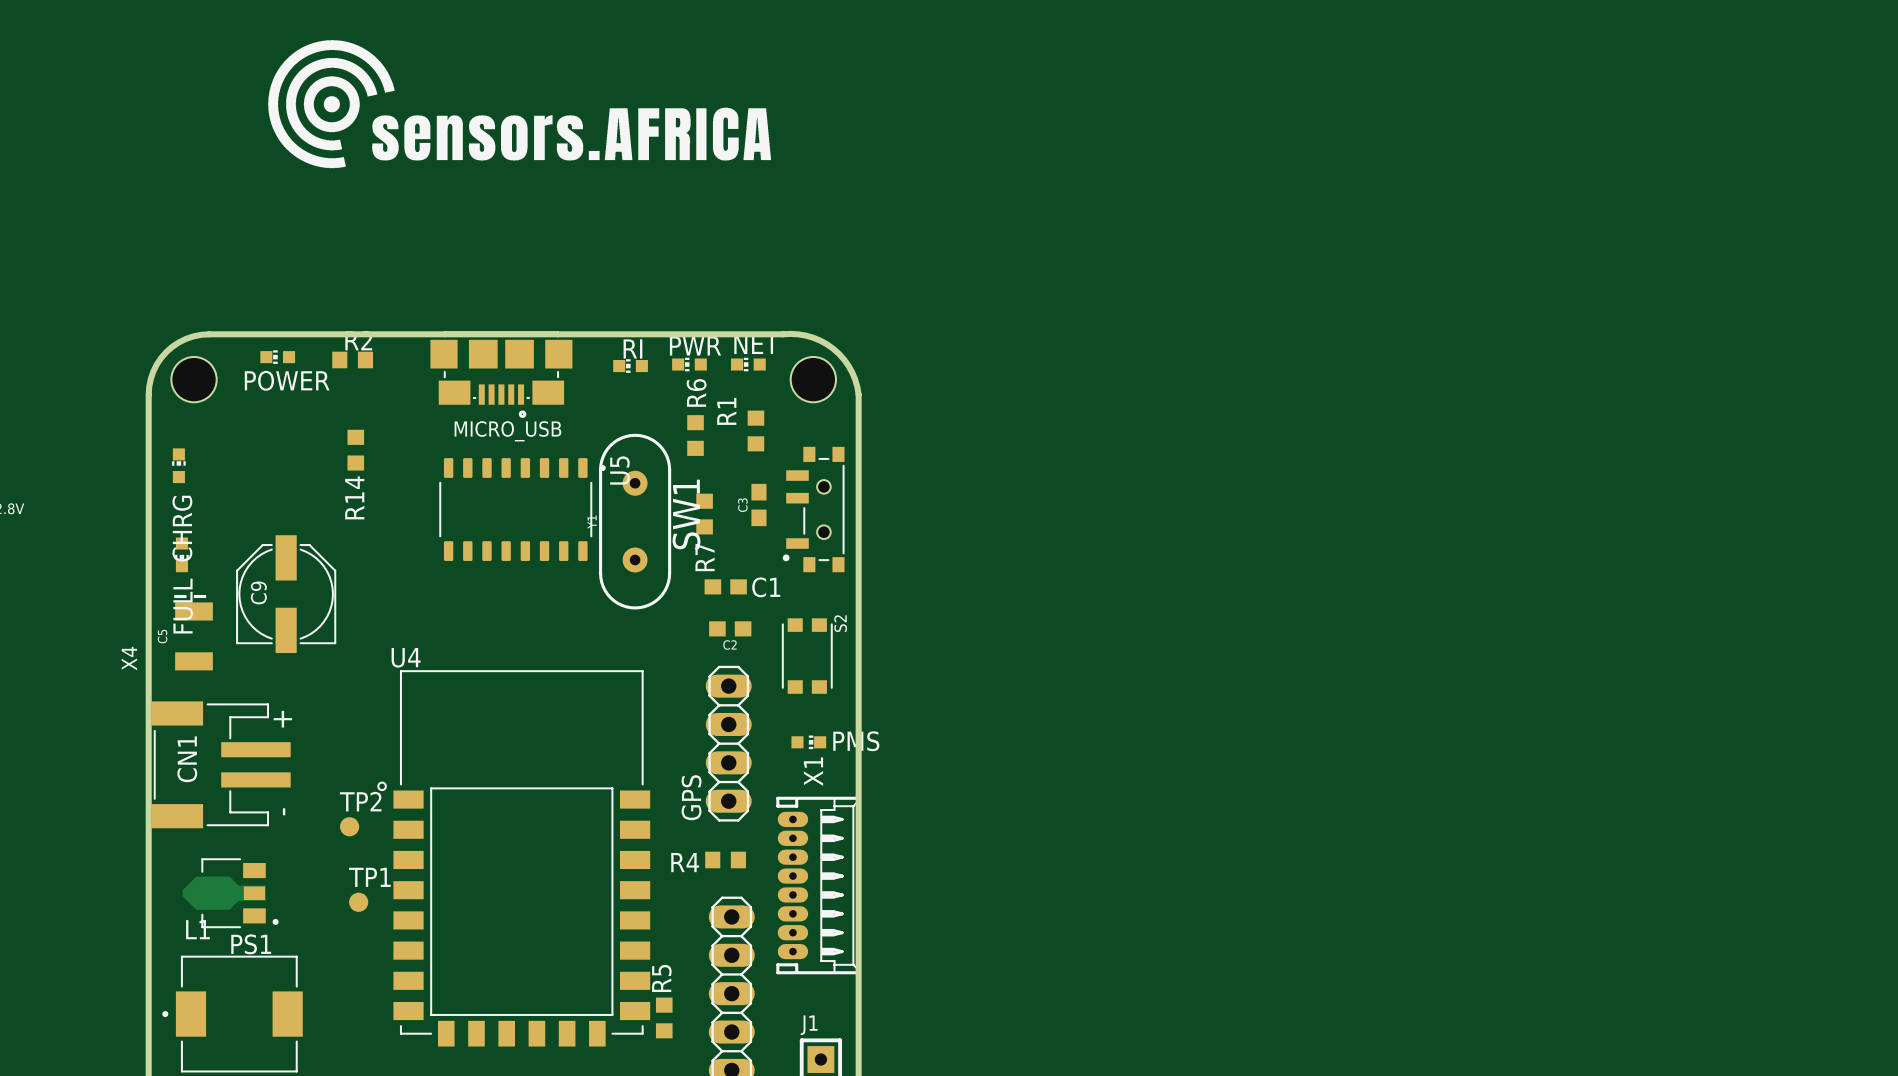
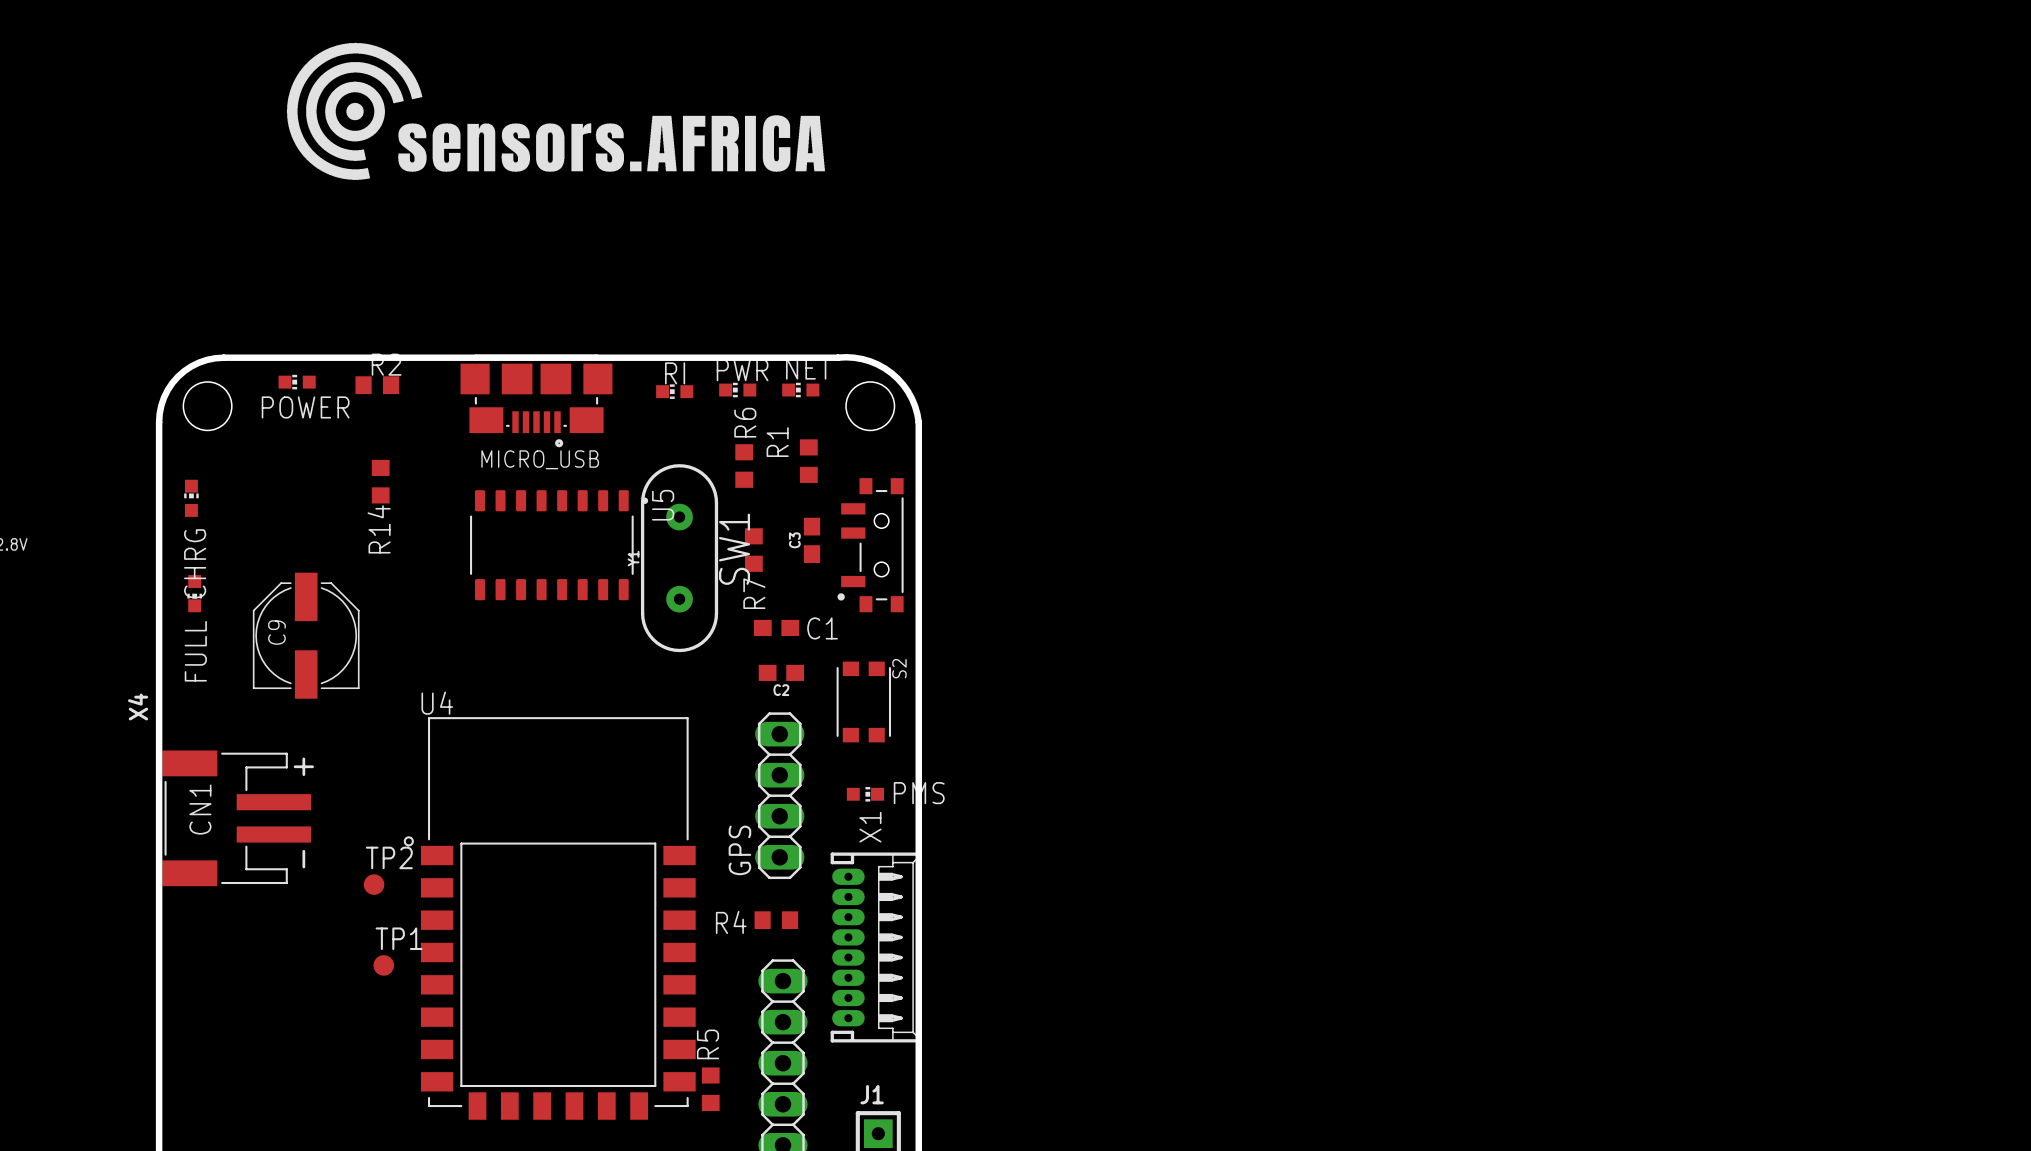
C5: (193, 632) -> none
PS1: (230, 893) -> none
L1: (232, 1014) -> none

